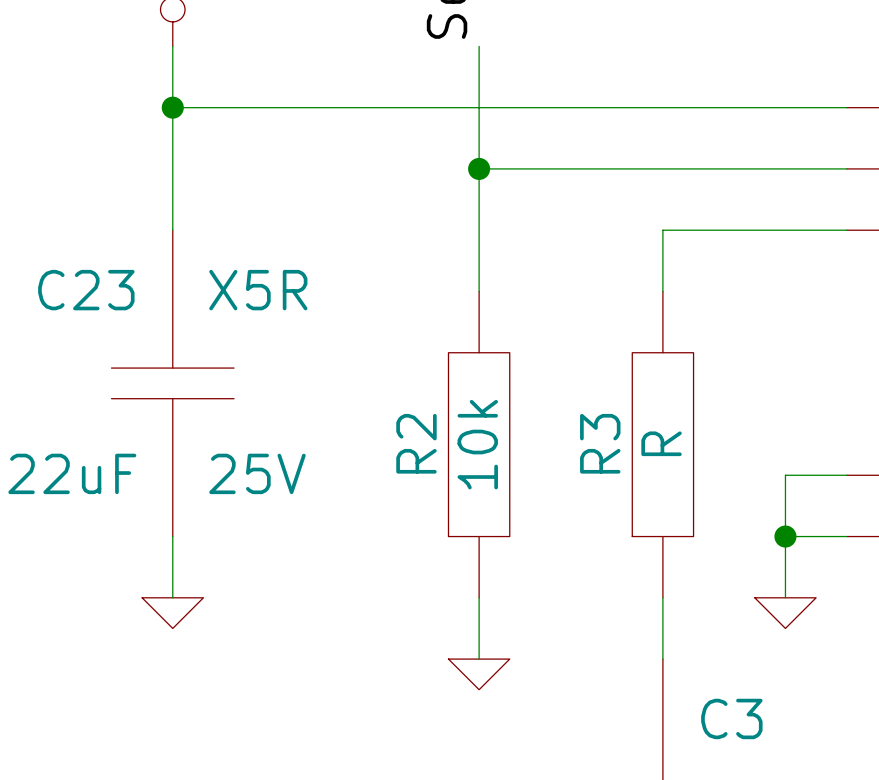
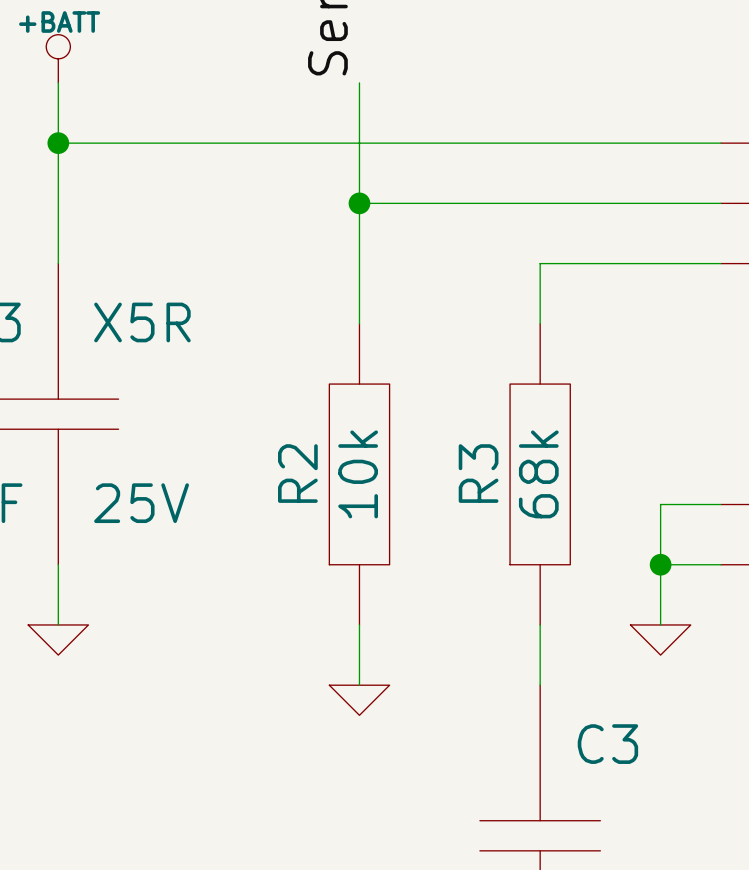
R3 value: R (661, 443) -> 68k (538, 474)

